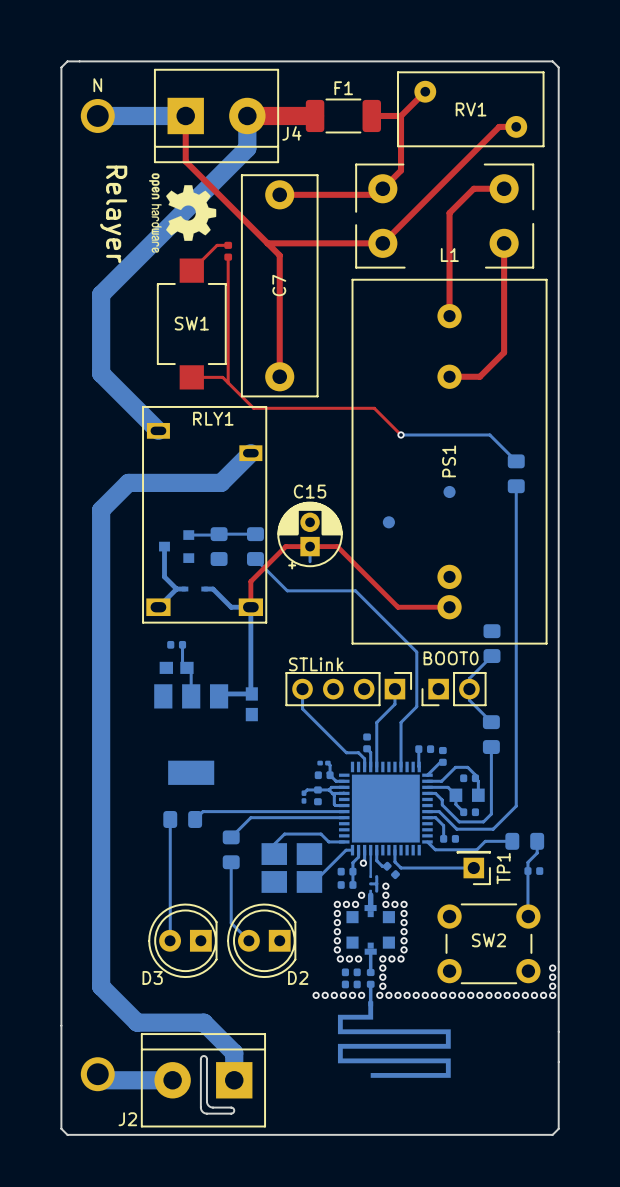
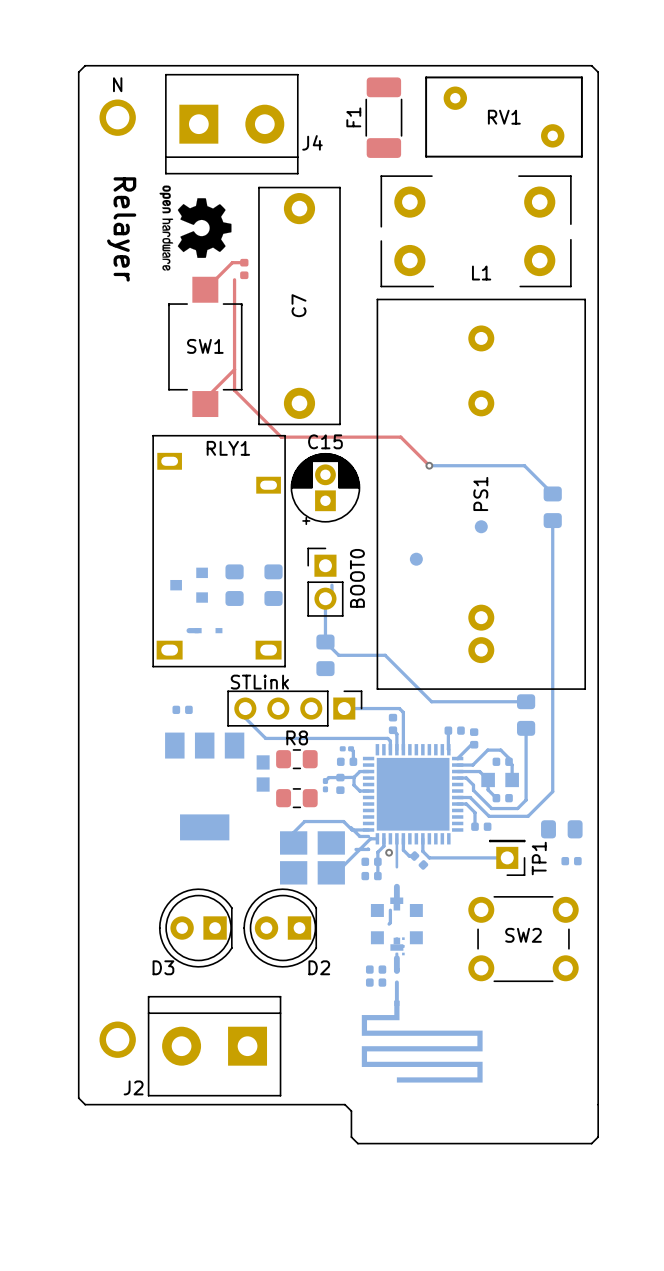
board edge: (79, 61) (67, 61) (61, 67) (61, 1128) (67, 1134) (552, 1134) (558, 1128) (558, 1062) -> (85, 65) (78, 72) (78, 1098) (85, 1104) (344, 1104) (351, 1111) (351, 1137) (357, 1143) (591, 1143) (598, 1137)
F1 name position: F1 (343, 88) -> F1 (353, 117)
top track: (425, 91) (401, 115) -> none
bottom track: (97, 115) (185, 115) -> none
top track: (185, 115) (185, 161) (279, 255) (279, 376) -> none
bottom track: (247, 115) (247, 148) (101, 294) (101, 373) (158, 430) -> none
top track: (247, 115) (315, 115) -> none
F1 rotation: 0° (343, 115) -> 90° clockwise (383, 117)
top track: (371, 115) (401, 115) -> none
top track: (401, 115) (401, 170) (376, 194) (279, 194) -> none
top track: (516, 126) (499, 126) (382, 243) (267, 243) -> none
top track: (504, 188) (473, 188) (449, 213) (449, 316) -> none
top track: (504, 243) (504, 352) (479, 376) (449, 376) -> none
top track: (228, 257) (228, 382) -> none
top track: none -> (234, 369) (195, 408)
top track: (191, 377) (222, 377) (253, 408) (262, 408) -> (234, 279) (234, 390) (281, 437)
bottom track: (250, 453) (221, 482) (128, 482) (101, 510) (101, 986) (137, 1022) (203, 1022) (234, 1052) (234, 1080) -> none
bottom track: (255, 534) (188, 535) -> none
C15 position: (310, 535) -> (325, 488)
N: none -> (117, 578)
bottom track: (164, 546) (164, 576) (176, 589) (158, 607) -> none
bottom track: (255, 559) (287, 590) (355, 590) (416, 652) (416, 706) (401, 722) (401, 766) -> none
bottom track: none -> (325, 598) (325, 642) (338, 655) (385, 655) (431, 701) (526, 701)
bottom track: (204, 589) (213, 589) (231, 607) (250, 607) (251, 693) (221, 693) (219, 696) -> none
N: (97, 595) -> none
top track: (250, 607) (250, 581) (285, 546) (337, 546) (397, 607) (449, 607) -> none
part: none -> (325, 655)
part position: (492, 643) -> (526, 715)
part: (176, 644) -> none
bottom track: (182, 644) (182, 663) (191, 672) (191, 696) -> none
bottom track: (492, 656) (469, 678) (469, 700) (491, 722) -> none
part footprint: [159, 661, 194, 674] -> [172, 705, 193, 715]
bottom track: none -> (245, 708) (245, 718) (265, 738) (387, 738) (390, 741) (390, 749)
bottom track: none -> (344, 708) (399, 708) (403, 712) (403, 749)
part: none -> (392, 723)
bottom track: none -> (526, 728) (526, 799)
part: none -> (454, 730)
bottom track: (302, 689) (302, 708) (346, 752) (358, 752) (364, 758) (364, 766) -> none
STLink position: (348, 689) -> (294, 708)
bottom track: (394, 689) (394, 704) (376, 722) (376, 766) -> none
part: none -> (474, 738)
BOOT0 rotation: 0° (454, 689) -> 90° clockwise (325, 582)
BOOT0 position: (454, 689) -> (325, 582)
part: none -> (346, 748)
part position: (251, 704) -> (263, 773)
part: none -> (347, 761)
part: none -> (502, 761)
bottom track: none -> (368, 771) (359, 771) (354, 777)
bottom track: none -> (354, 777) (328, 777) (325, 781)
bottom track: none -> (354, 777) (354, 785) (359, 791) (368, 791)
part: none -> (340, 783)
part: none -> (325, 785)
part: (491, 734) -> none
bottom track: (516, 739) (516, 806) (493, 829) (456, 829) (439, 811) (427, 811) -> (552, 791) (528, 816) (489, 816) (470, 797) (457, 797)
part: none -> (413, 794)
part: (367, 742) -> none
part: none -> (502, 798)
bottom track: (491, 747) (491, 814) (483, 821) (459, 821) (442, 804) (442, 800) (435, 793) (427, 793) -> (526, 800) (517, 808) (491, 808) (473, 790) (473, 785) (466, 778) (457, 778)
bottom track: (367, 748) (370, 752) (370, 766) -> (392, 730) (396, 734) (396, 749)
bottom track: (418, 749) (419, 766) -> (448, 730) (448, 749)
part: (424, 749) -> none
part: (442, 756) -> none
part footprint: [338, 761, 433, 856] -> [409, 851, 429, 870]
bottom track: (442, 762) (440, 762) (427, 775) -> (474, 744) (471, 744) (457, 758)
part: (324, 763) -> none
bottom track: (327, 763) (330, 765) (330, 775) -> (351, 748) (353, 751) (353, 761)
part: none -> (481, 826)
part: none -> (561, 829)
part: (324, 775) -> none
part: (469, 778) -> none
bottom track: (427, 781) (441, 781) (455, 767) (467, 767) (478, 781) (478, 795) -> (457, 765) (472, 765) (487, 750) (500, 750) (509, 758) (512, 764) (512, 779)
bottom track: (344, 787) (331, 787) (329, 789) -> none
bottom track: (427, 787) (448, 787) (455, 795) (455, 804) (463, 812) -> (457, 771) (479, 771) (488, 779) (488, 789) (496, 798)
bottom track: (329, 789) (307, 789) (303, 793) -> none
bottom track: (329, 789) (334, 795) (334, 804) (344, 805) -> none
part: (317, 795) -> none
part position: (467, 795) -> (500, 779)
via: none -> (389, 852)
part: (303, 797) -> none
part: none -> (371, 861)
part: none -> (571, 861)
bottom track: (344, 811) (203, 811) (195, 819) -> none
part: (469, 812) -> none
bottom track: (344, 817) (250, 817) (231, 837) -> none
bottom track: (427, 817) (435, 817) (443, 825) (443, 838) -> (457, 804) (466, 804) (475, 812) (475, 826)
part: none -> (371, 876)
bottom track: (170, 819) (170, 940) -> none
R8 side: bottom (182, 819) -> top (296, 759)
bottom track: none -> (396, 886) (396, 899)
part: (449, 838) -> none
bottom track: (344, 841) (328, 841) (320, 834) (284, 834) (274, 844) (274, 854) -> (368, 829) (352, 829) (343, 821) (304, 821) (293, 832) (293, 842)
bottom track: (512, 841) (485, 841) (476, 849) (435, 849) (427, 841) -> none
part: (524, 841) -> none
bottom track: (537, 841) (537, 853) (527, 862) (528, 916) -> none
part side: bottom (231, 849) -> top (296, 798)
bottom track: (352, 850) (346, 850) (314, 881) (309, 881) -> (377, 838) (370, 838) (336, 872) (331, 872)
bottom track: (358, 850) (358, 857) (352, 862) (352, 884) -> (383, 838) (383, 846) (377, 852) (377, 876)
bottom track: (370, 850) (370, 876) -> (396, 838) (396, 867)
bottom track: (376, 850) (376, 860) (382, 866) (387, 866) -> (403, 838) (403, 850) (409, 856) (414, 856)
bottom track: (394, 850) (394, 861) (401, 868) (473, 868) -> (422, 838) (422, 851) (429, 857) (507, 857)
bottom track: (231, 862) (231, 923) (248, 940) -> none
via: (363, 863) -> none
part position: (291, 868) -> (312, 857)
TP1 position: (473, 868) -> (507, 857)
part: (391, 870) -> none
part: (347, 871) -> none
part: (533, 871) -> none
bottom track: (376, 876) (376, 891) -> none
bottom track: (370, 883) (376, 883) -> none
part: (347, 884) -> none
via: (385, 886) -> none
via: (361, 895) -> none
via: (385, 895) -> none
via: (337, 904) -> none
via: (346, 904) -> none
via: (355, 904) -> none
via: (385, 904) -> none
via: (394, 904) -> none
via: (404, 904) -> none
part: none -> (376, 969)
via: (337, 913) -> none
via: (404, 913) -> none
part: none -> (376, 982)
via: (337, 922) -> none
via: (404, 922) -> none
part position: (370, 929) -> (396, 924)
via: (337, 931) -> none
via: (404, 931) -> none
D3 position: (182, 940) -> (195, 928)
D2 position: (261, 940) -> (280, 928)
via: (337, 940) -> none
via: (404, 940) -> none
SW2 position: (488, 943) -> (523, 939)
via: (337, 949) -> none
via: (404, 949) -> none
bottom track: (370, 951) (370, 972) -> none
via: (340, 958) -> none
via: (349, 958) -> none
via: (358, 958) -> none
via: (382, 958) -> none
via: (391, 958) -> none
via: (401, 958) -> none
via: (382, 968) -> none
via: (552, 968) -> none
part: (351, 972) -> none
via: (382, 977) -> none
via: (552, 977) -> none
part: (370, 978) -> none
part: (351, 984) -> none
bottom track: (370, 984) (370, 1003) -> (396, 982) (396, 1003)
via: (382, 986) -> none
via: (552, 986) -> none
via: (316, 995) -> none
via: (325, 995) -> none
via: (334, 995) -> none
via: (343, 995) -> none
via: (352, 995) -> none
via: (361, 995) -> none
via: (379, 995) -> none
via: (388, 995) -> none
via: (397, 995) -> none
via: (407, 995) -> none
via: (416, 995) -> none
via: (425, 995) -> none
via: (434, 995) -> none
via: (443, 995) -> none
via: (452, 995) -> none
via: (461, 995) -> none
via: (470, 995) -> none
via: (479, 995) -> none
via: (488, 995) -> none
via: (498, 995) -> none
via: (507, 995) -> none
via: (516, 995) -> none
via: (525, 995) -> none
via: (534, 995) -> none
via: (543, 995) -> none
via: (552, 995) -> none
part position: (394, 1039) -> (422, 1041)
board edge: (200, 1059) (201, 1110) (206, 1113) (232, 1113) (234, 1110) (232, 1107) (212, 1107) (207, 1104) (206, 1058) (203, 1056) (200, 1059) -> none
bottom track: (97, 1074) (103, 1080) (172, 1080) -> none
J2 position: (203, 1080) -> (214, 1046)

